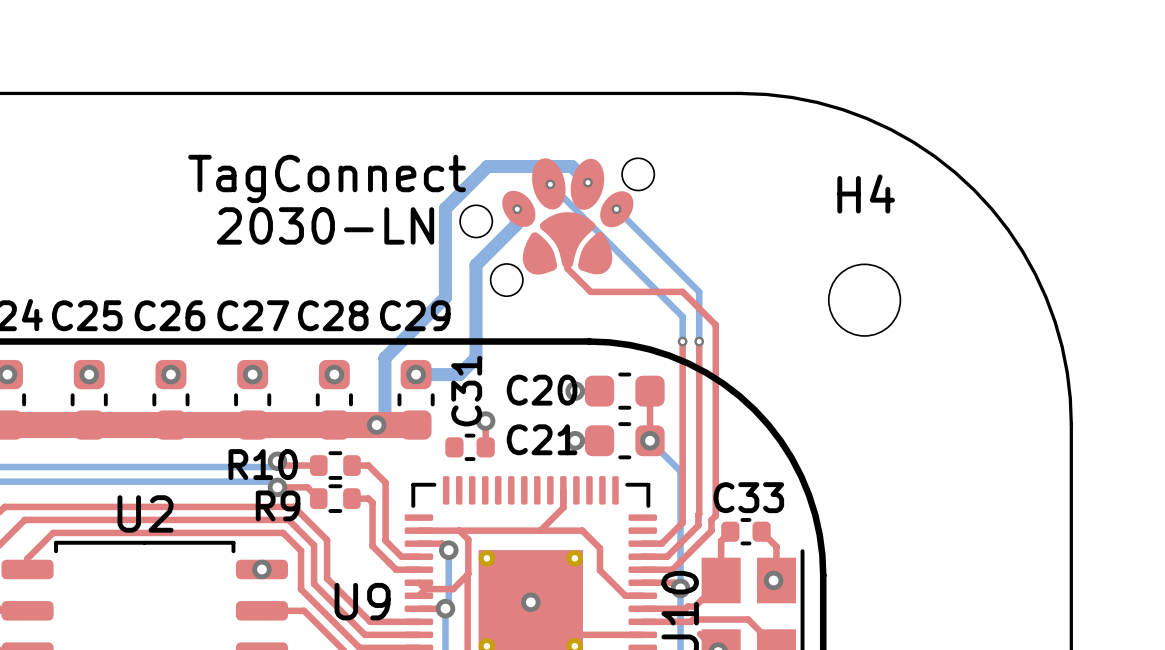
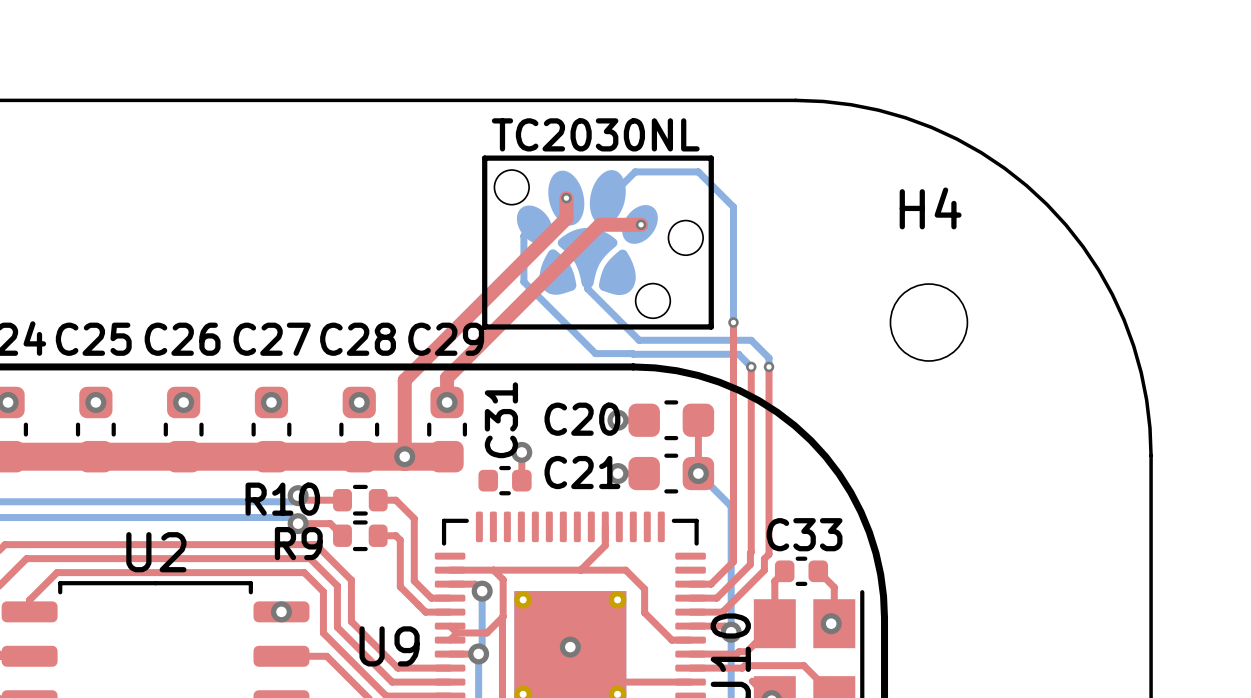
text: none -> TC2030NL (595, 134)
line: none -> (484, 158) (711, 158) (711, 326) (484, 326) (484, 158)
text: TagConnect (327, 178) -> none
bottom track: (587, 182) (571, 166) (487, 166) (445, 208) (445, 297) (384, 358) (384, 416) (376, 425) -> none
via: (587, 182) -> none
top track: none -> (566, 198) (566, 218) (404, 380) (404, 456)
via: none -> (566, 198)
bottom track: (550, 184) (682, 316) (682, 341) -> none
via: (550, 184) -> none
bottom track: none -> (608, 198) (635, 171) (698, 171) (733, 207) (733, 322)
via: (517, 209) -> none
top track: none -> (641, 224) (600, 224) (447, 377) (447, 402)
via: none -> (641, 224)
bottom track: (616, 209) (699, 291) (699, 341) -> (535, 224) (523, 235) (523, 281) (595, 353) (738, 354) (751, 366)
via: (616, 209) -> none
bottom track: (516, 210) (516, 225) (475, 265) (475, 357) (459, 374) (416, 374) -> none
text: 2030-LN (325, 225) -> none
part side: top (557, 227) -> bottom (598, 244)
bottom track: none -> (587, 260) (587, 288) (639, 340) (751, 340) (769, 358) (769, 366)
top track: (567, 262) (567, 268) (590, 291) (682, 291) (715, 324) (715, 341) -> none
top track: none -> (733, 322) (733, 366)
via: none -> (733, 322)
via: (682, 341) -> none
via: none -> (769, 366)

